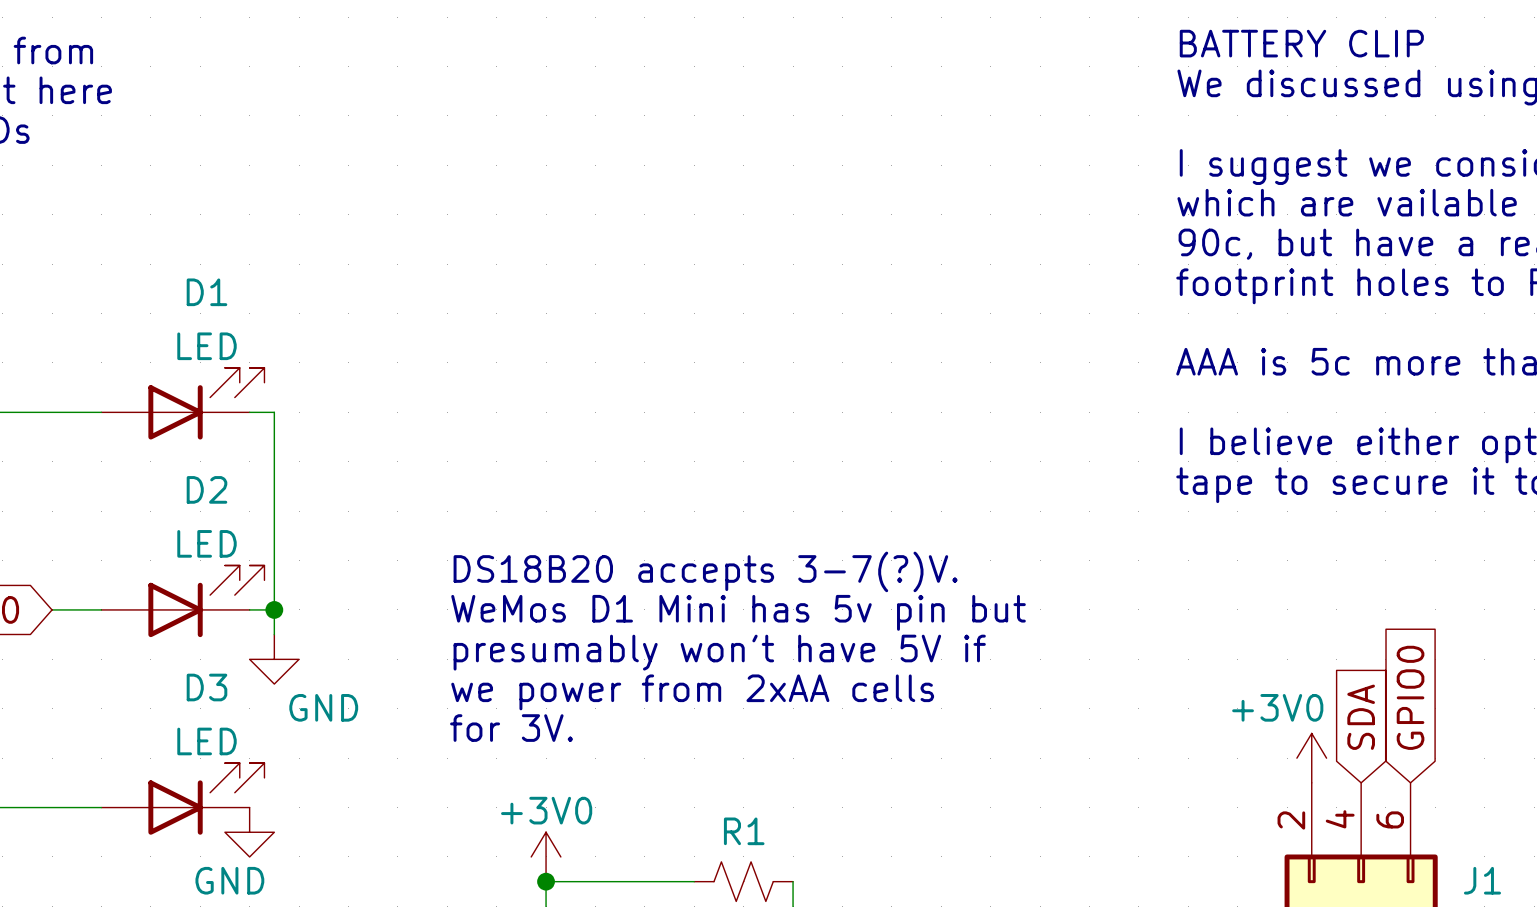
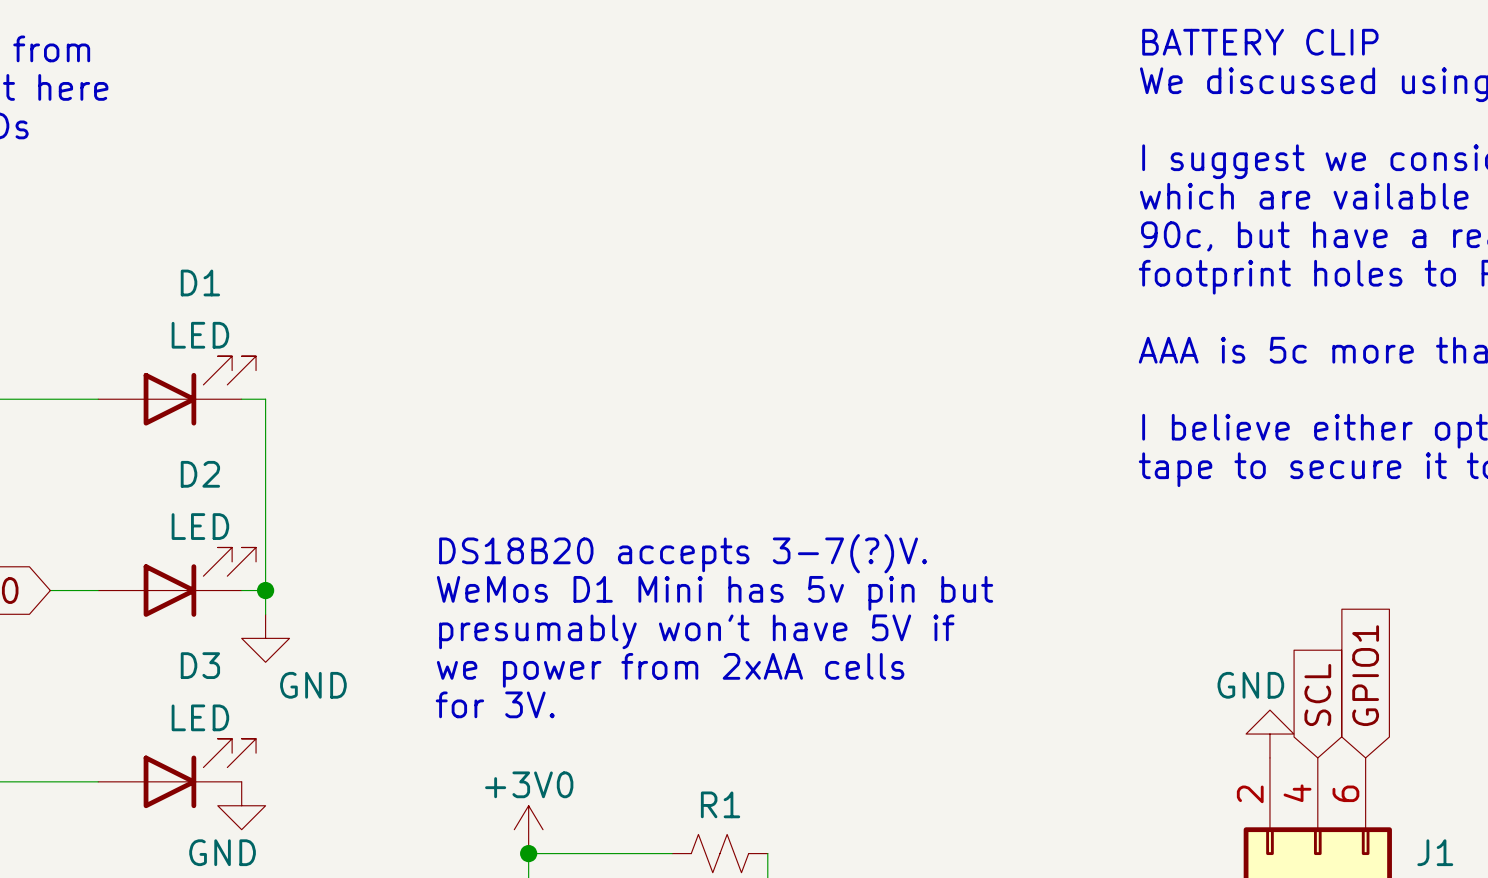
global label: GPIO0 (1410, 697) -> GPIO1 (1365, 675)
global label: SDA (1361, 717) -> SCL (1317, 694)
power symbol: +3V0 (1311, 758) -> GND (1269, 734)

